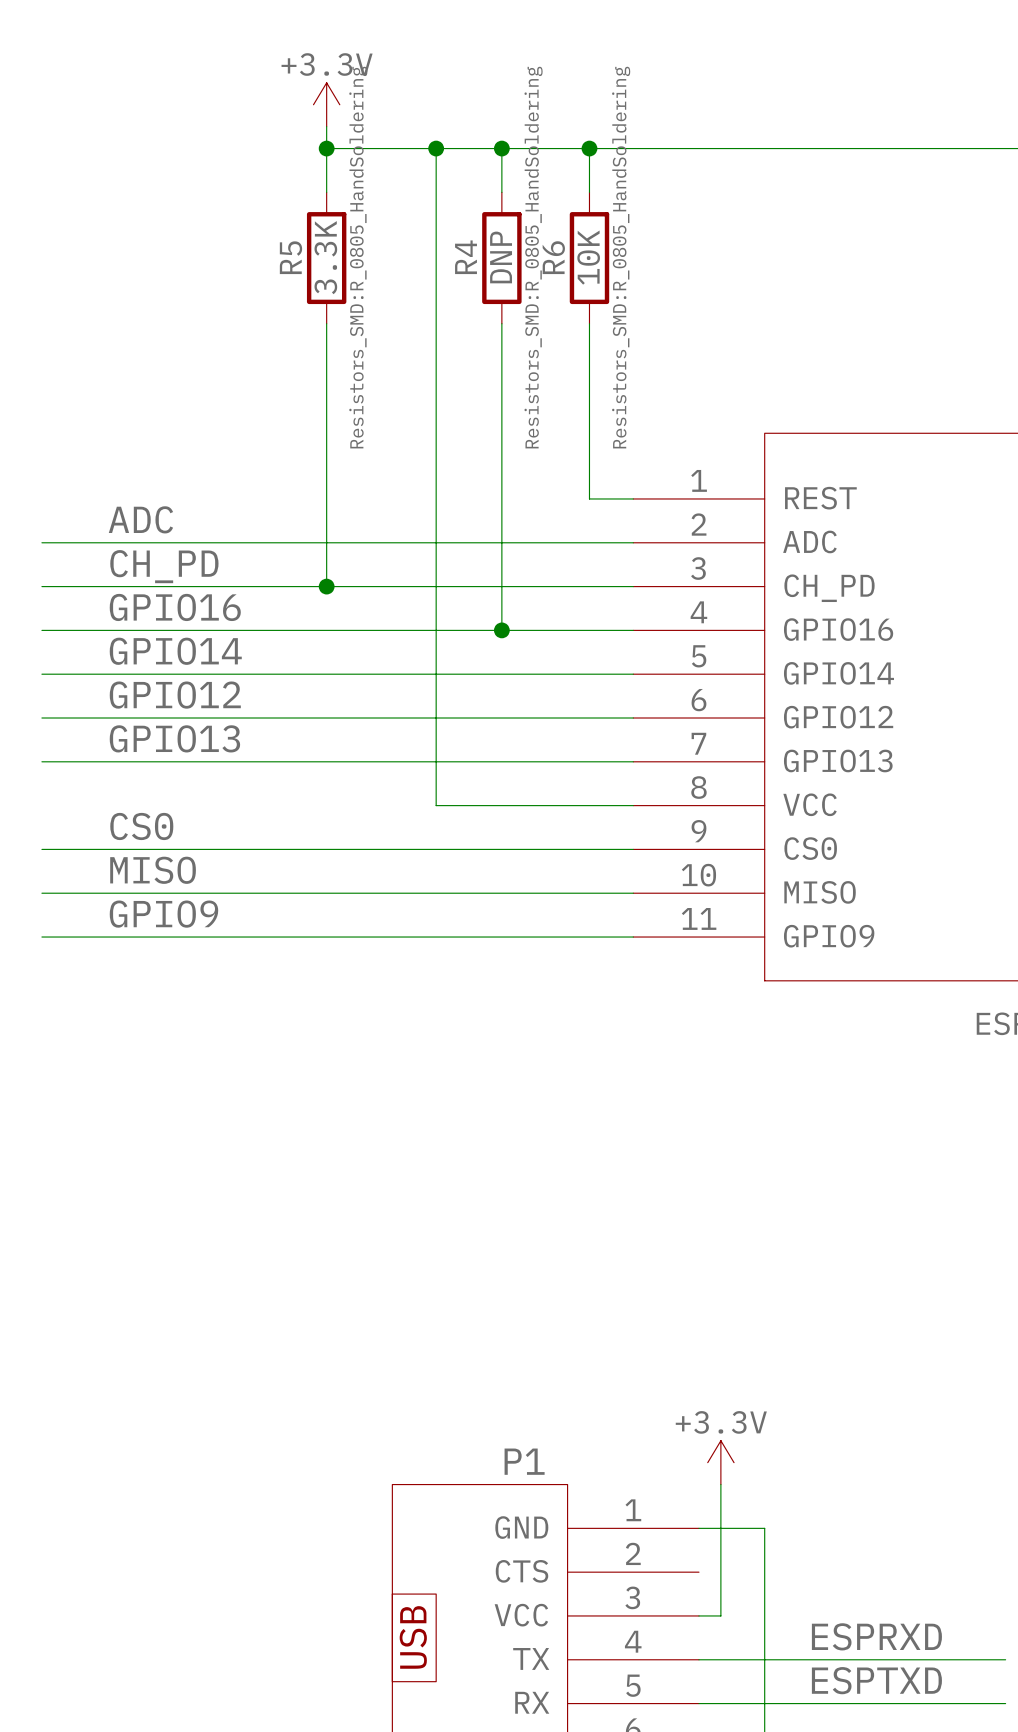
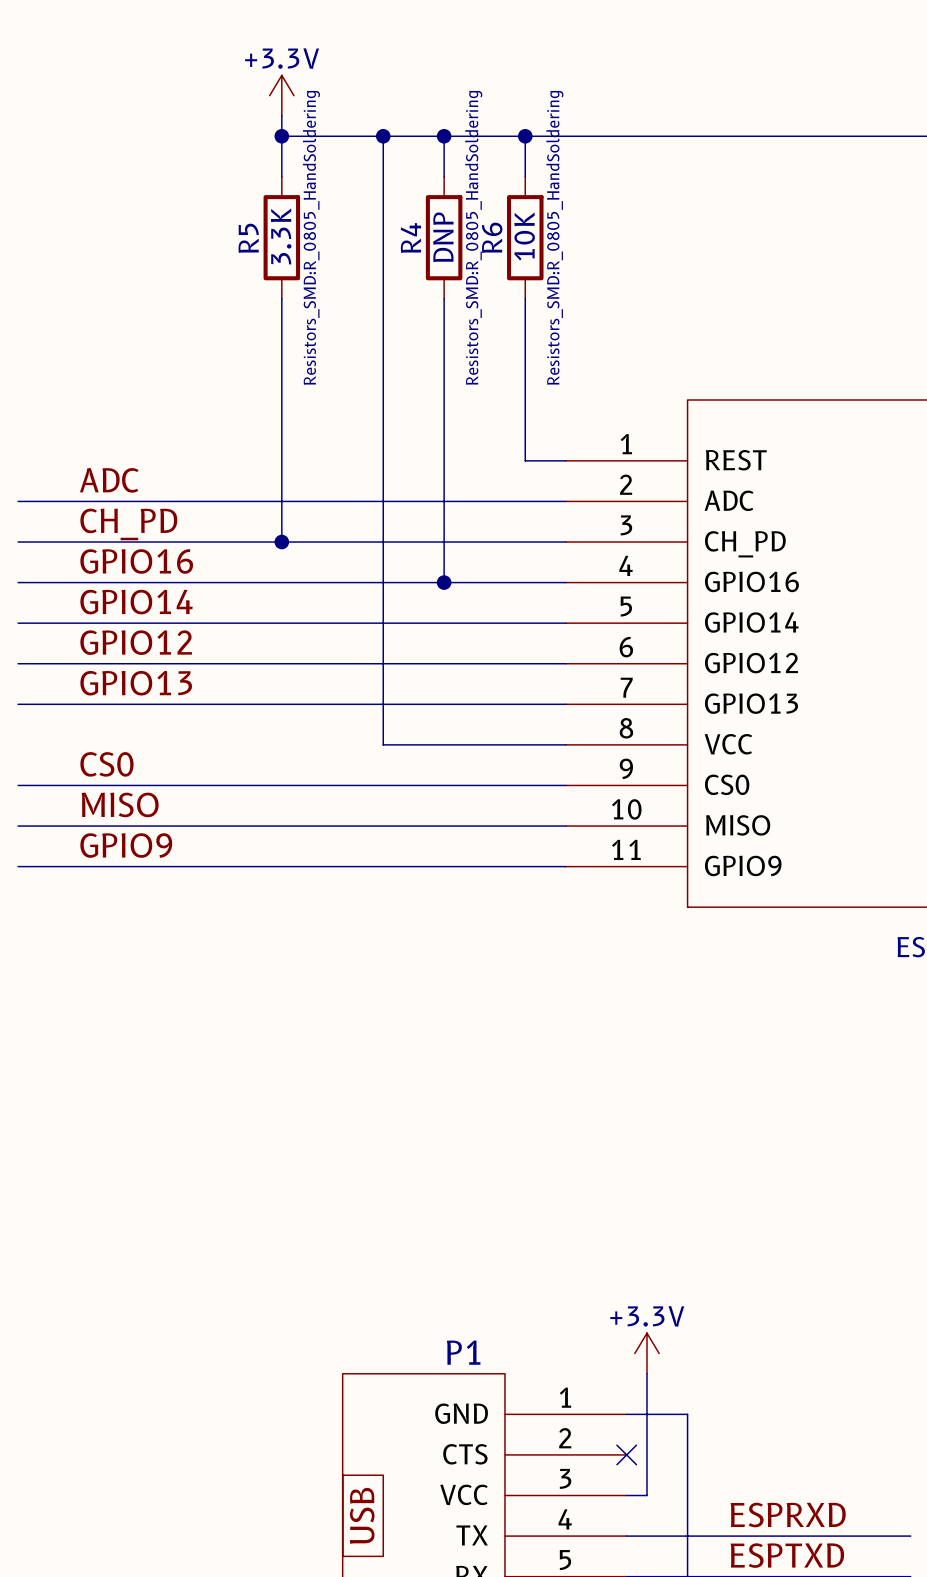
no-connect mark: none -> (626, 1454)

